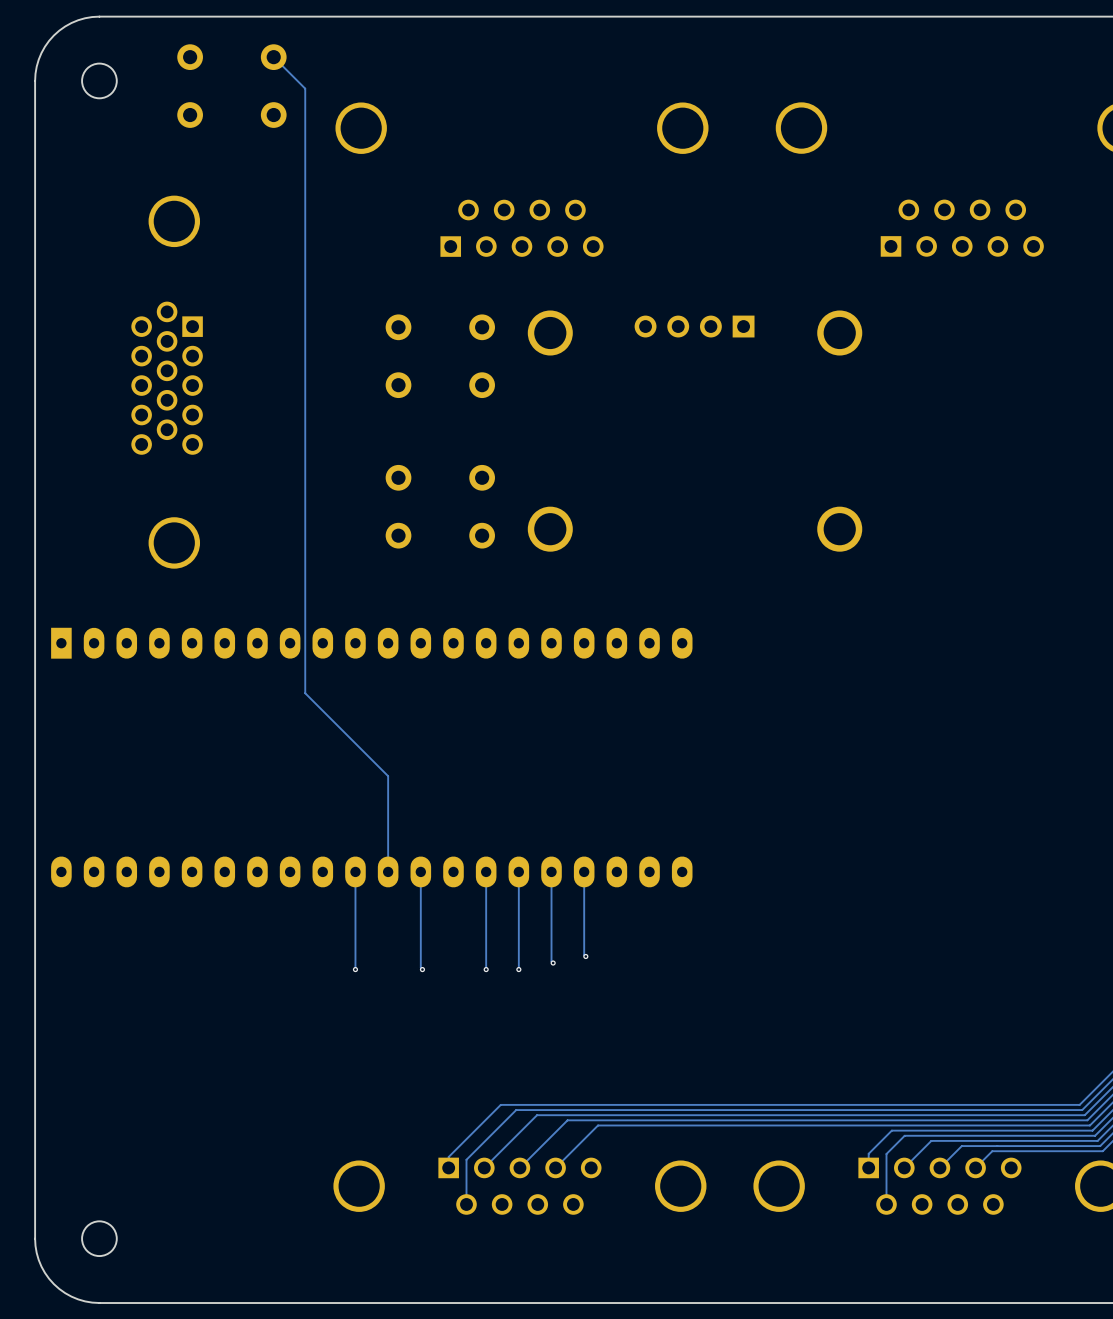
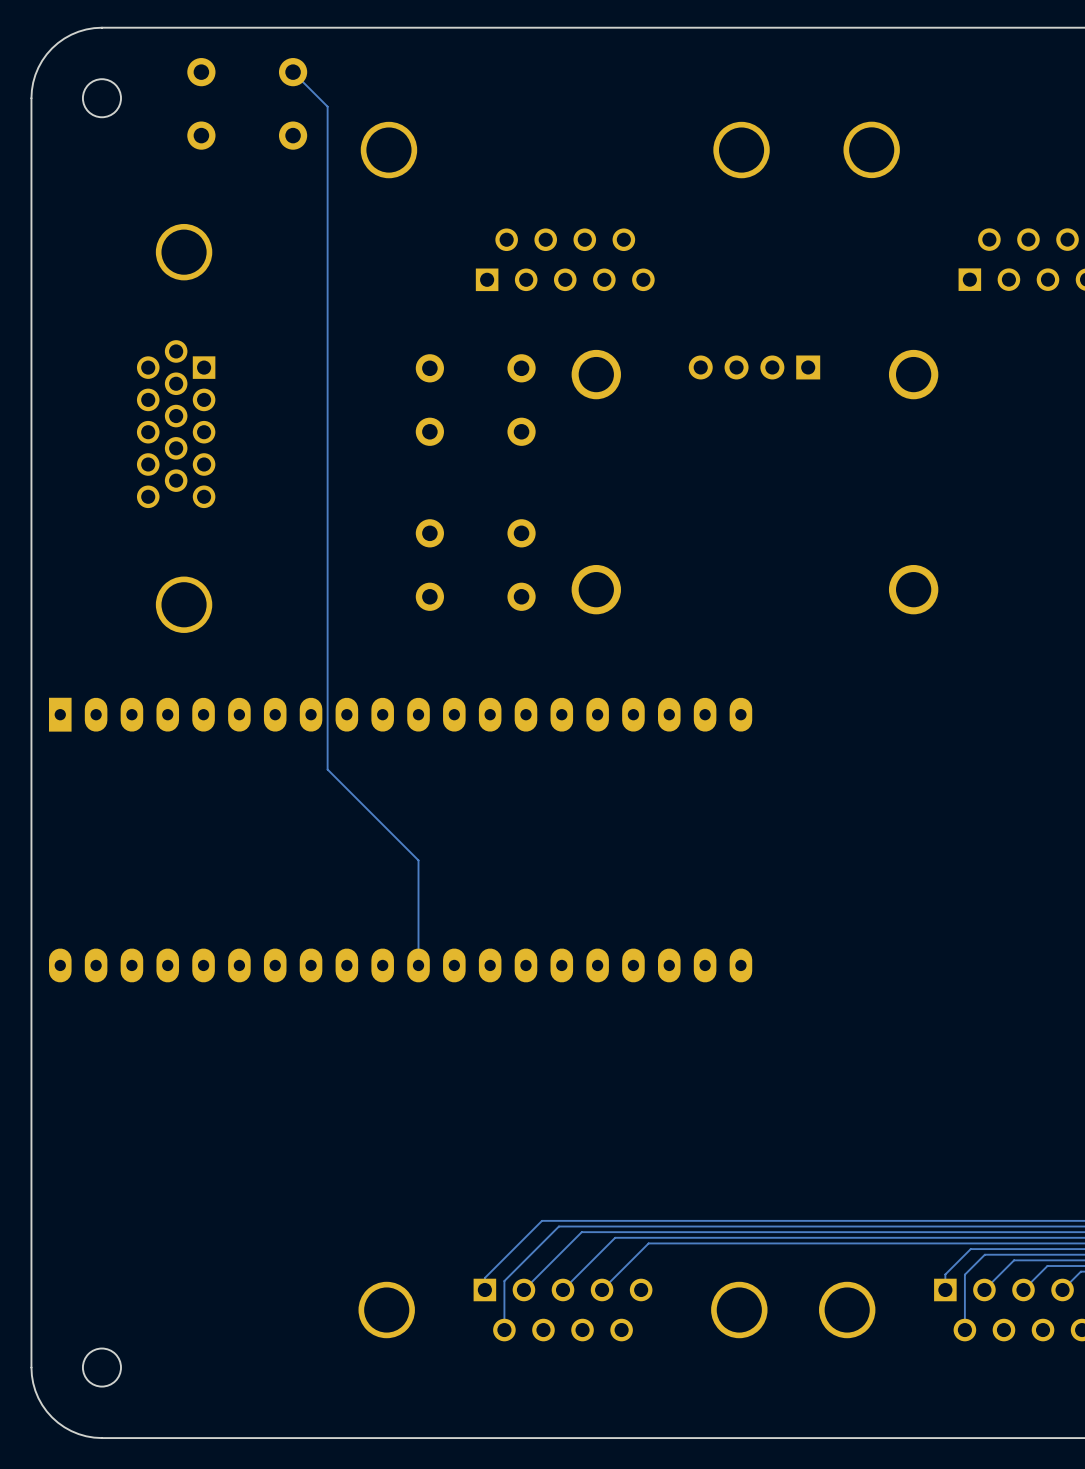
track: (355, 871) (355, 969) -> none
track: (420, 871) (420, 967) (422, 969) -> none
track: (486, 871) (486, 969) -> none
track: (518, 871) (518, 969) -> none
track: (551, 871) (551, 961) (553, 963) -> none
track: (584, 871) (584, 954) (585, 956) -> none
via: (585, 956) -> none
via: (553, 963) -> none
via: (355, 969) -> none
via: (422, 969) -> none
via: (486, 969) -> none
via: (518, 969) -> none

